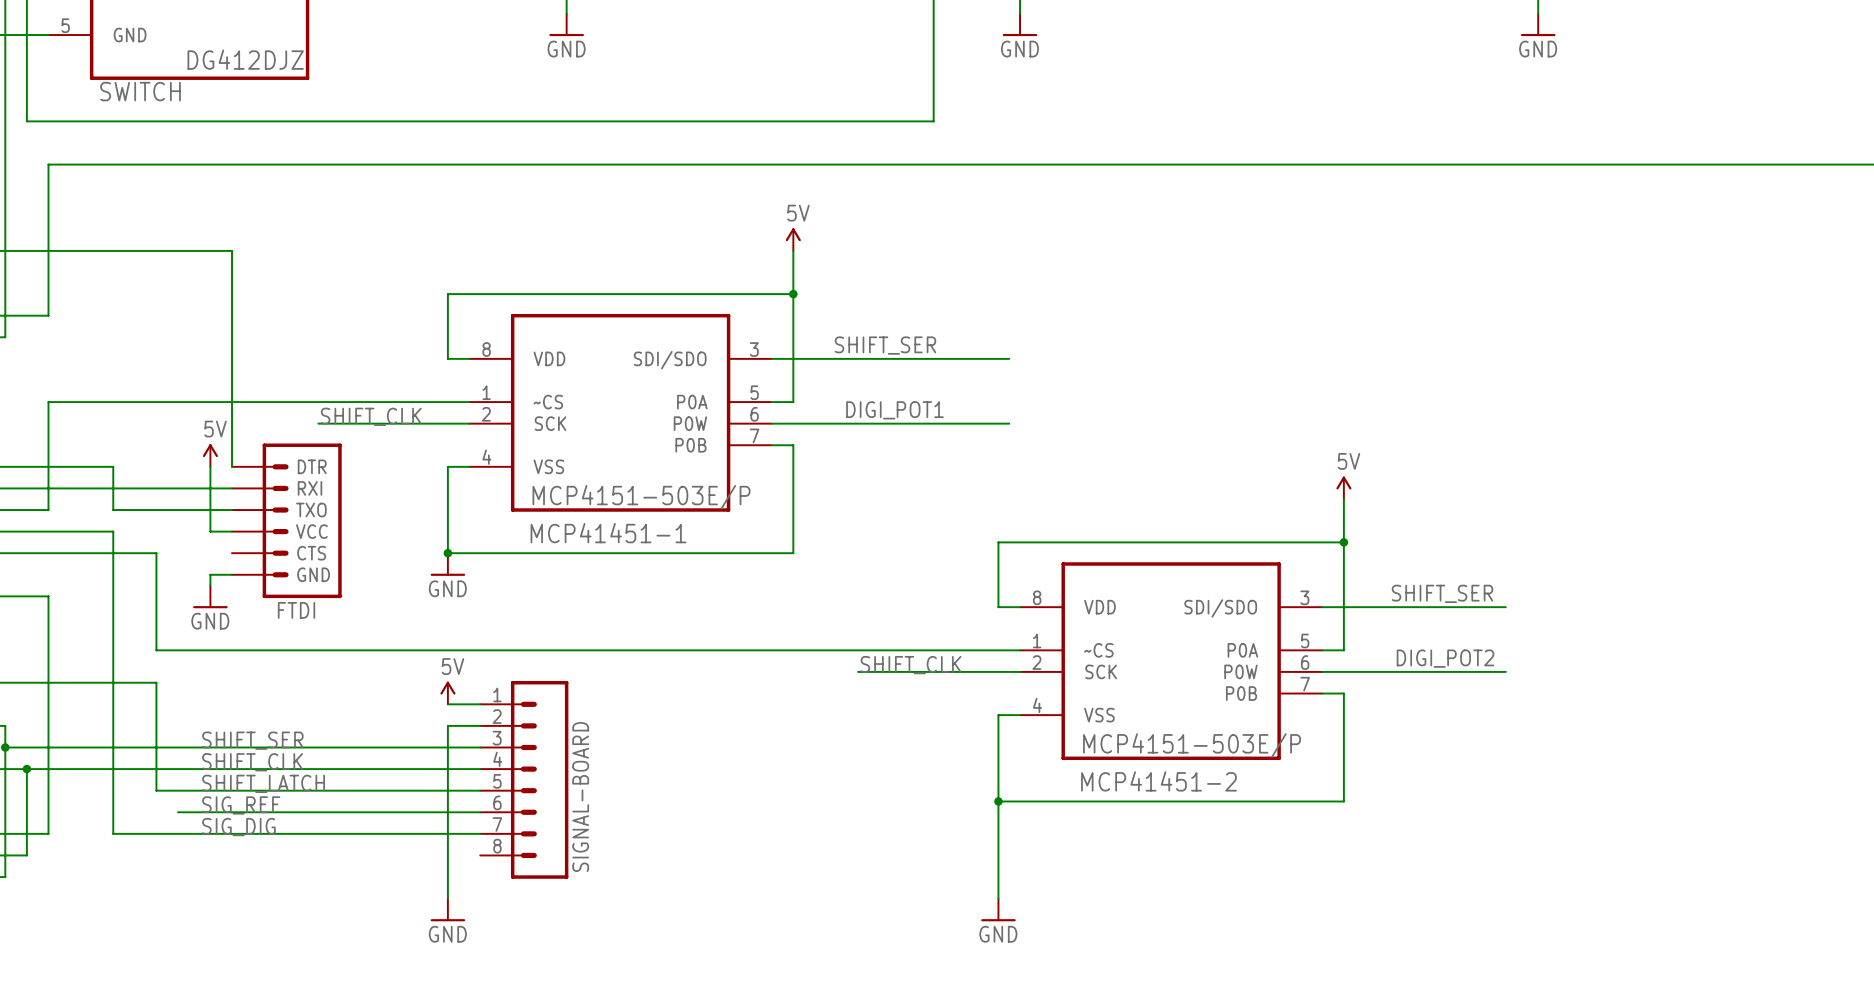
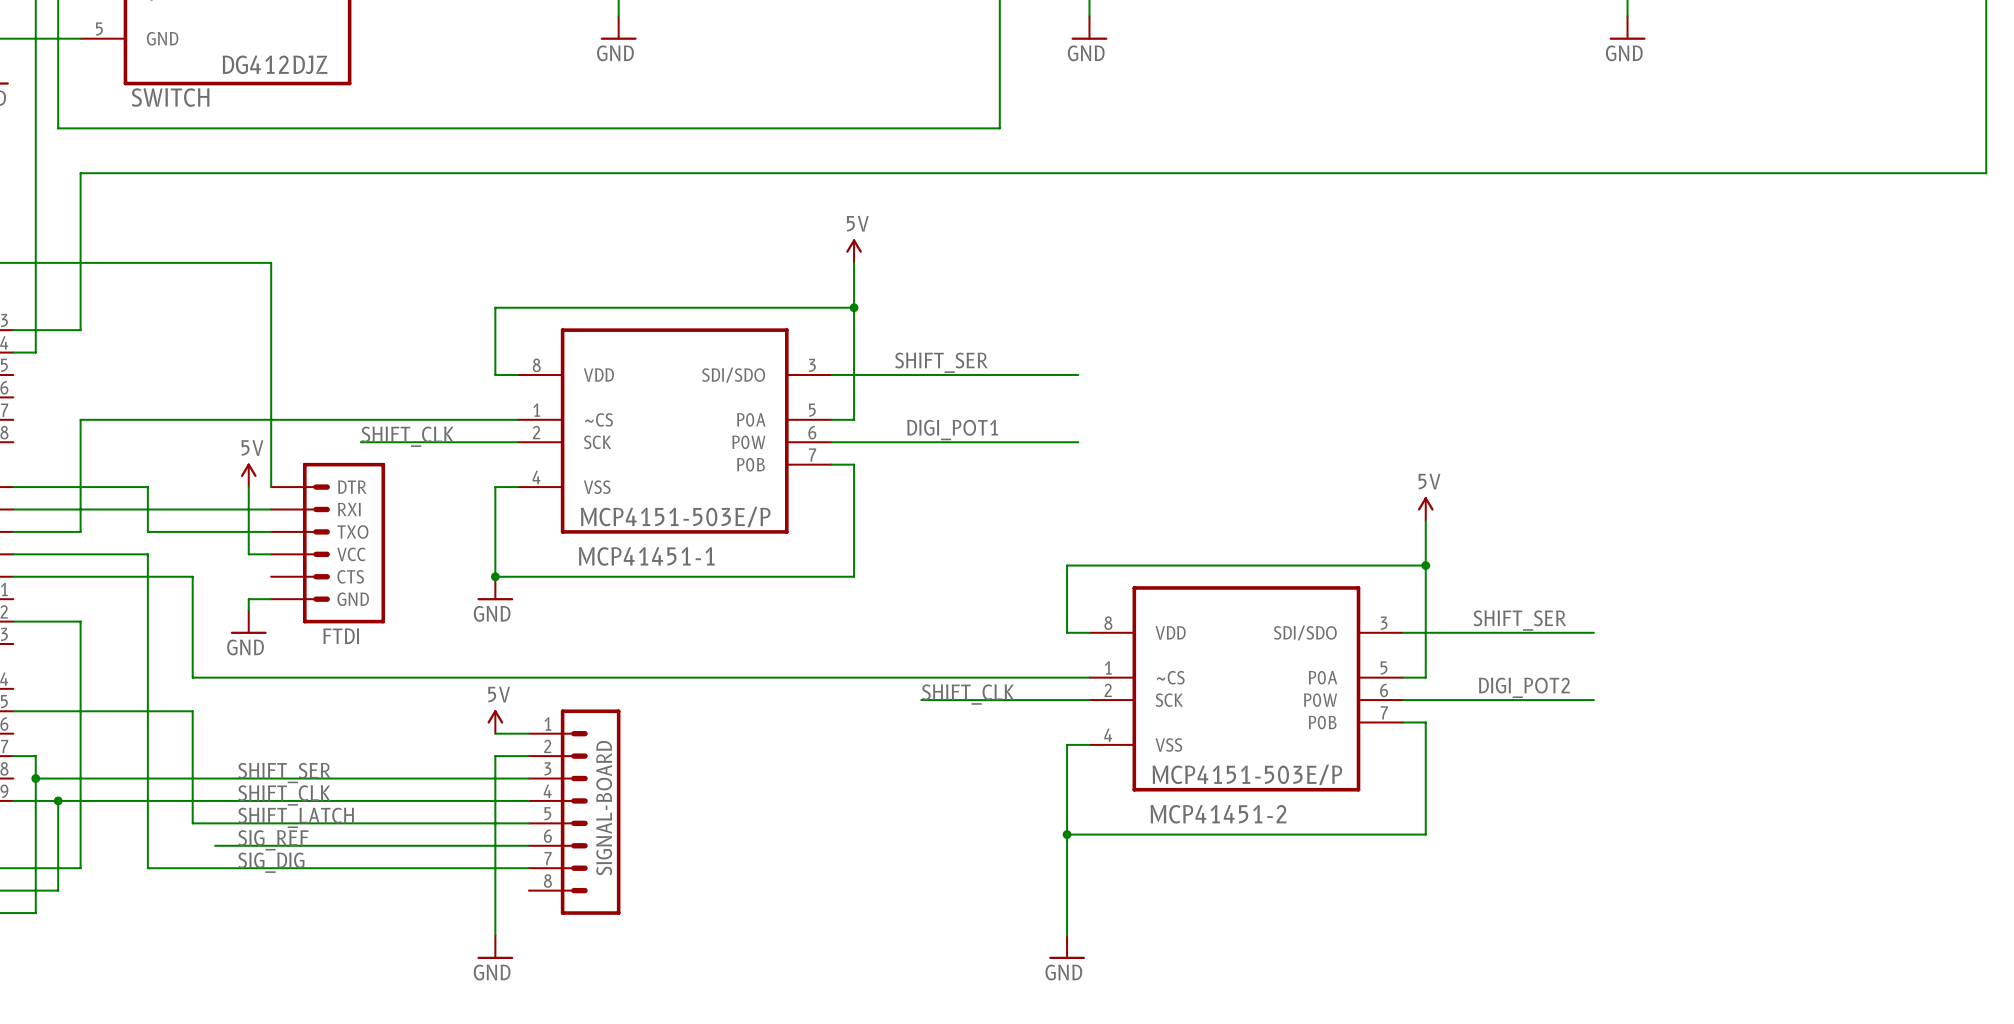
SIGNAL-BOARD name position: SIGNAL-BOARD (580, 796) -> SIGNAL-BOARD (604, 808)

